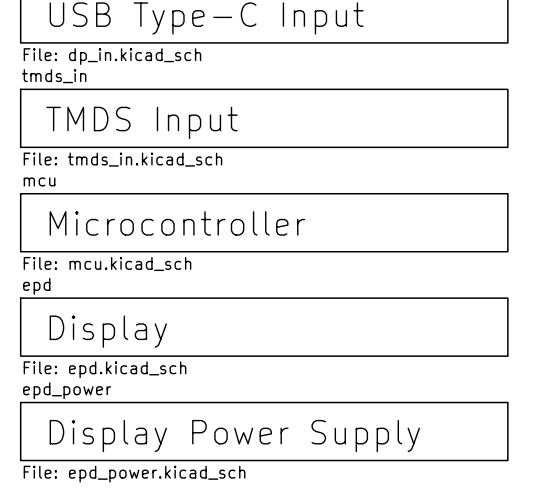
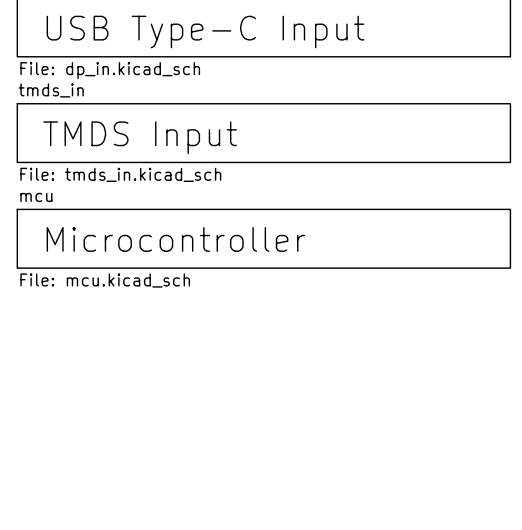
sheet epd: File: epd.kicad_sch (264, 327) -> none
text: Display (108, 331) -> none
sheet epd_power: File: epd_power.kicad_sch (264, 431) -> none
text: Display Power Supply (234, 436) -> none

